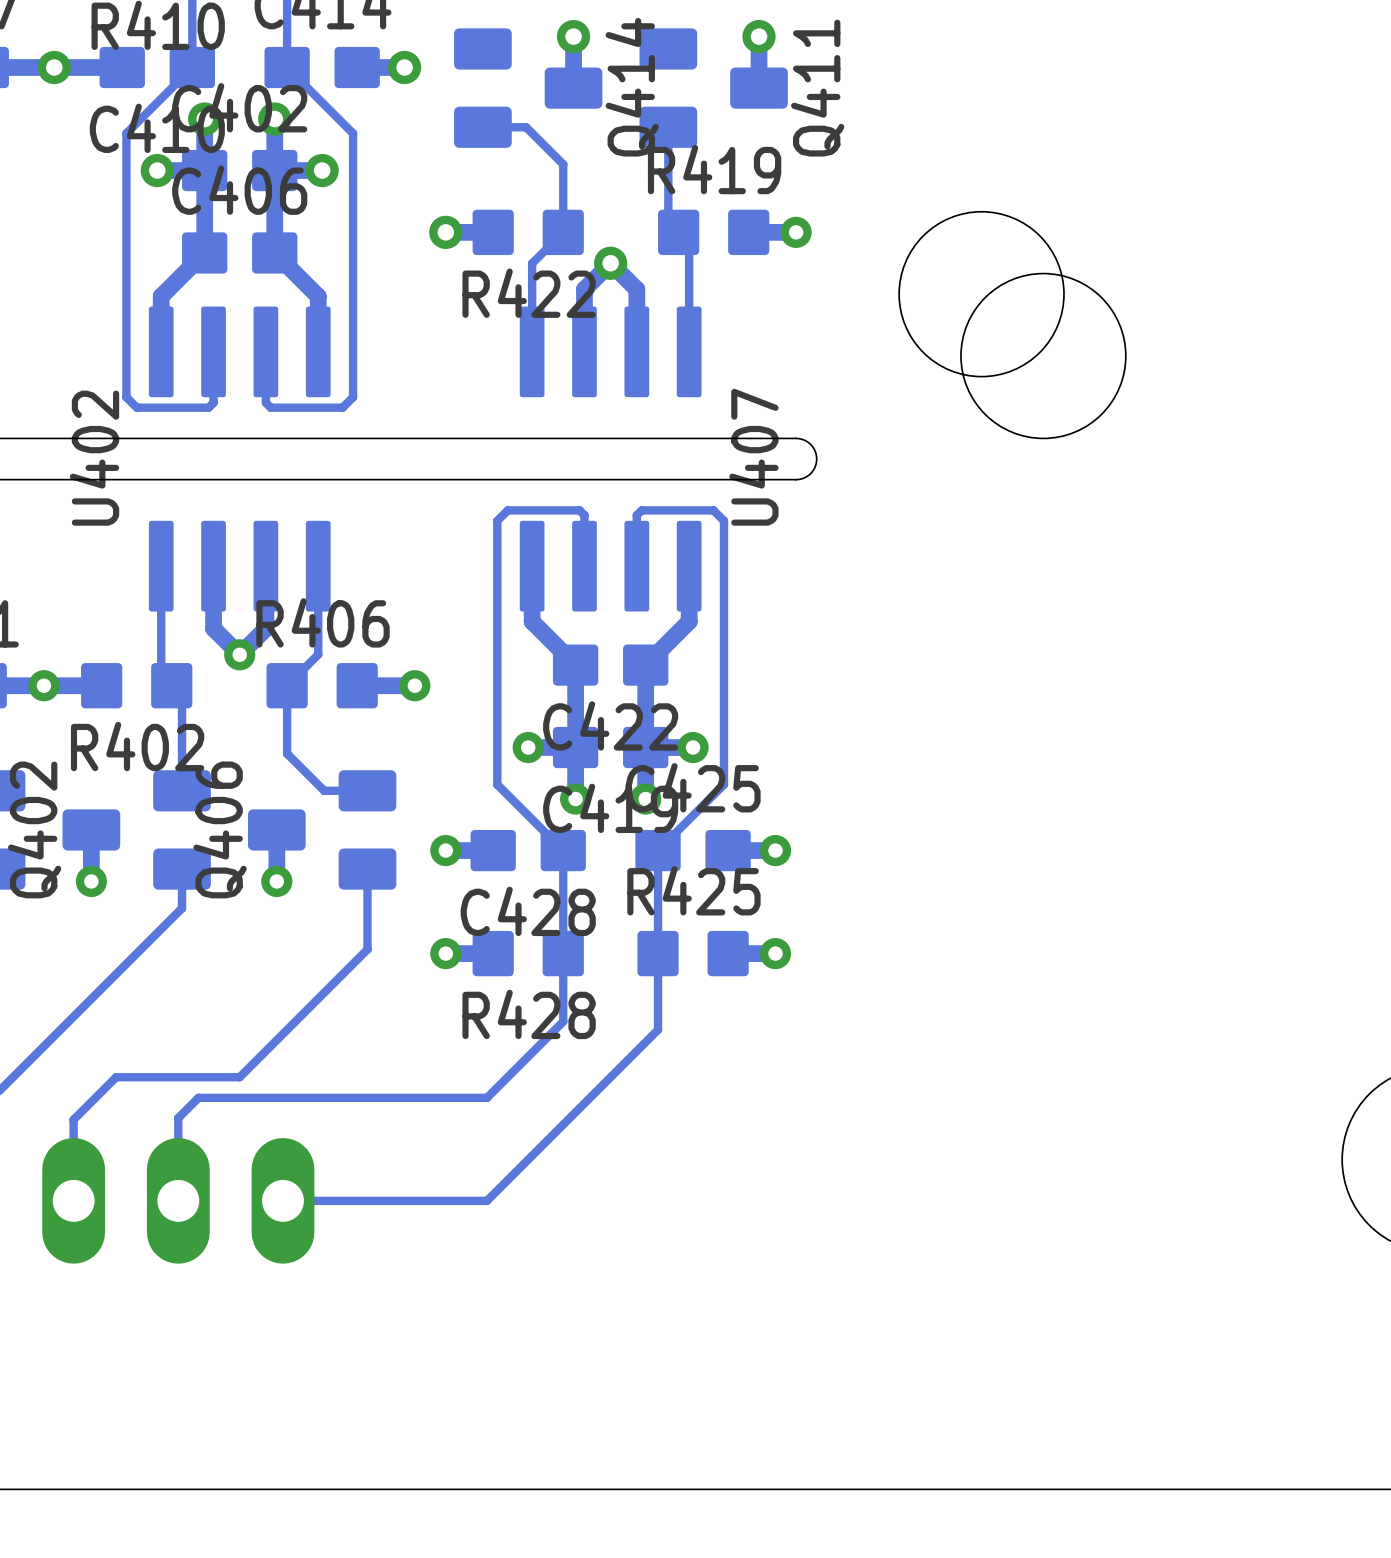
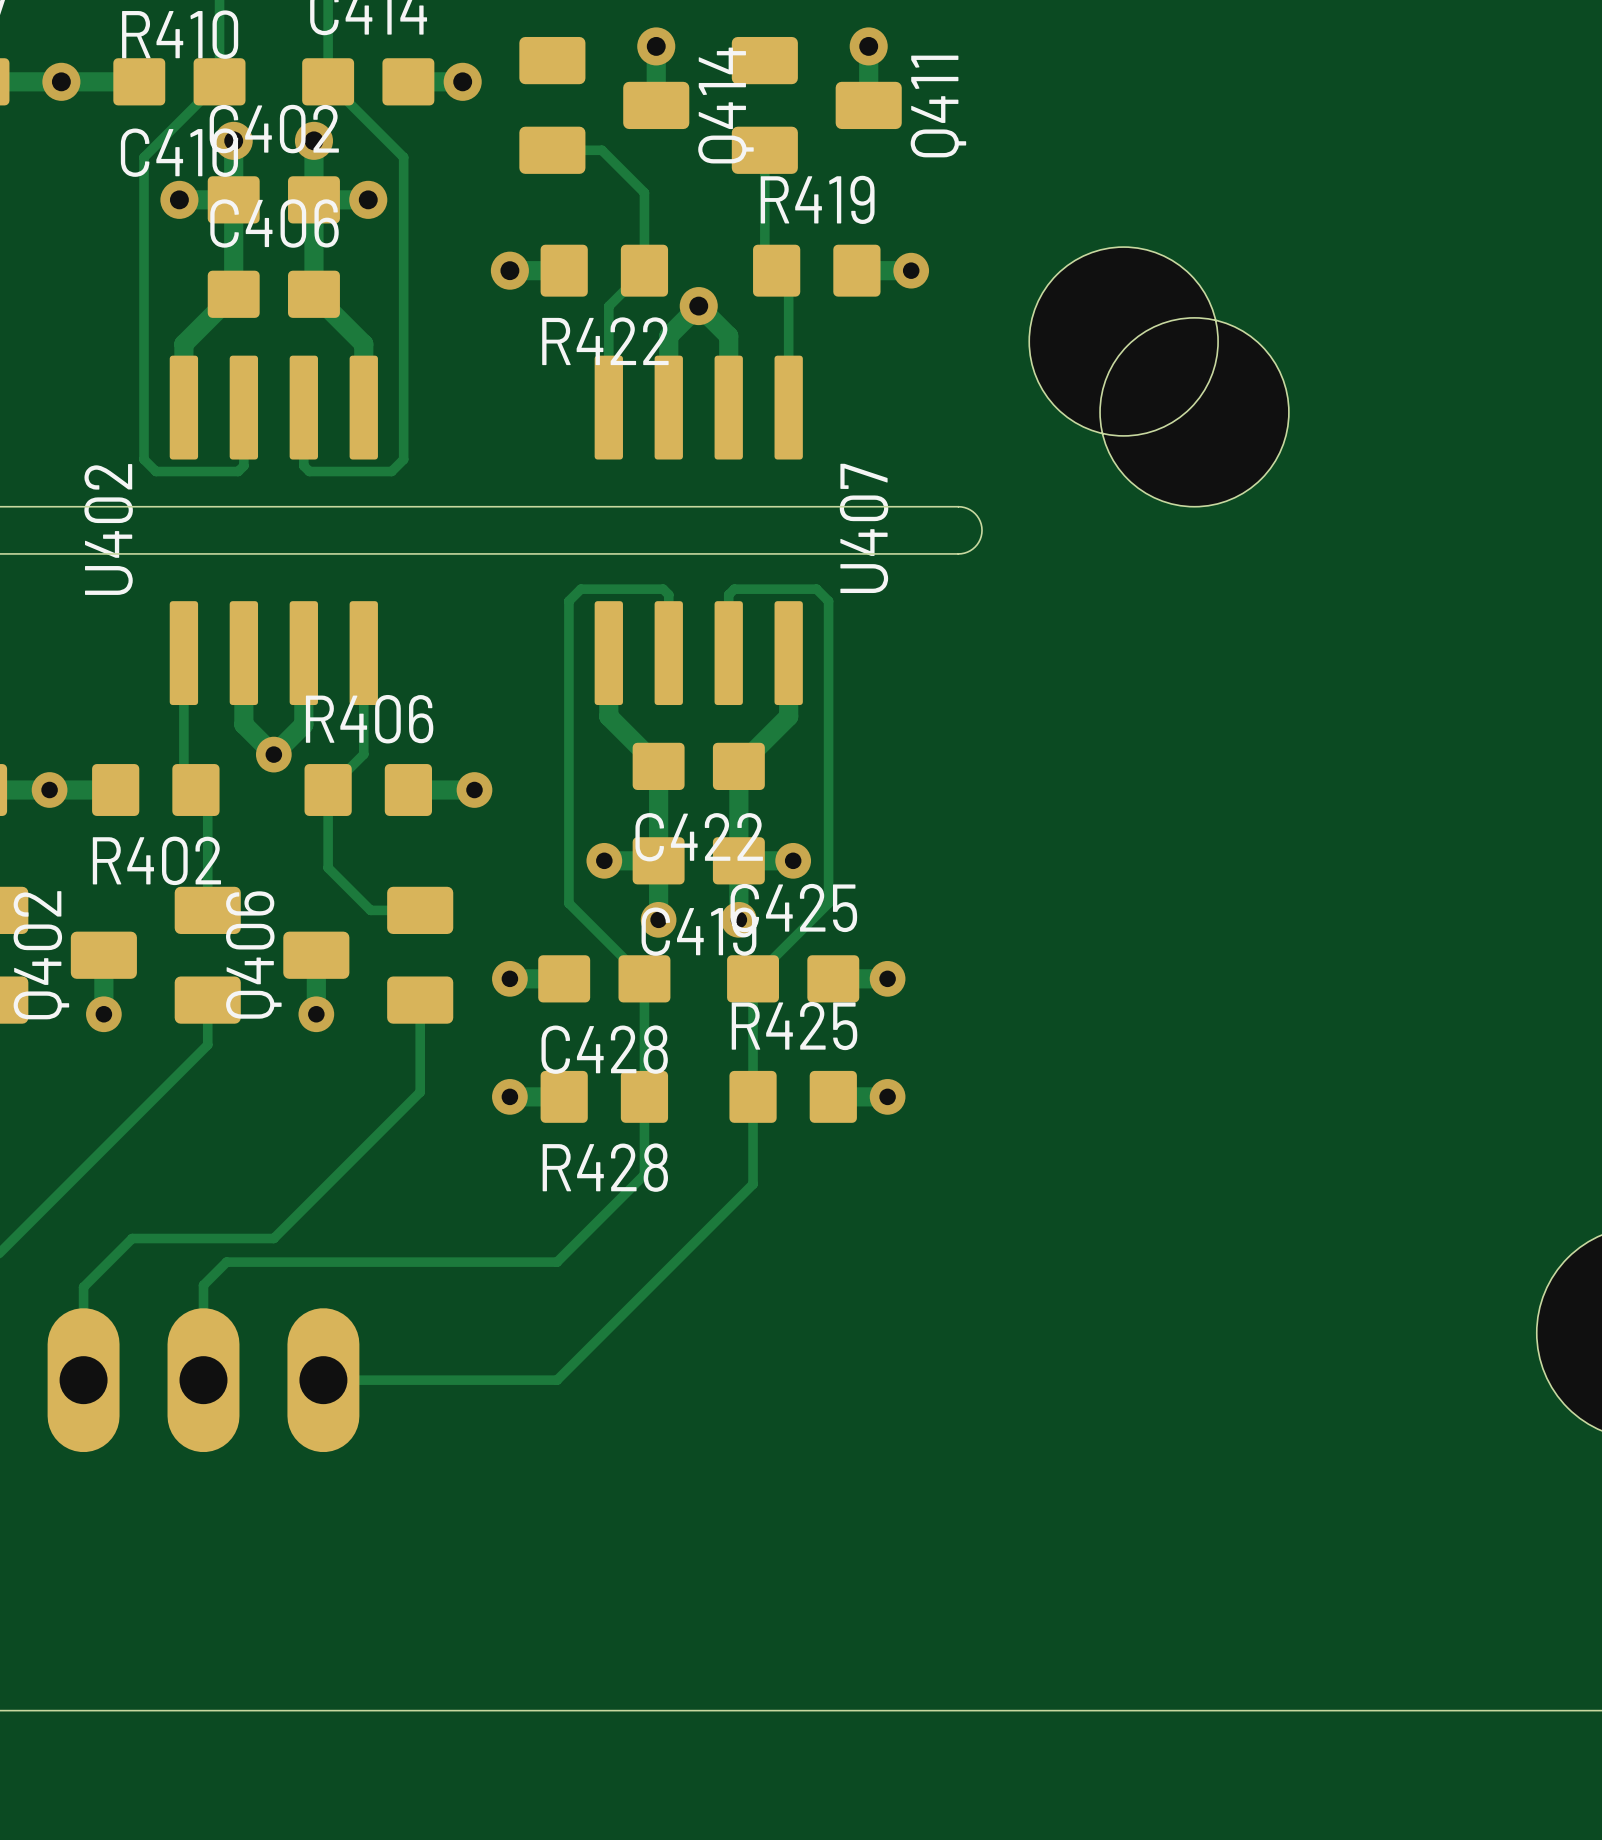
board edge: (796, 438) (803, 440) (810, 444) (815, 451) (816, 459) (815, 466) (810, 473) (803, 478) (796, 479) -> (911, 506) (964, 507) (977, 515) (982, 530) (977, 544) (964, 553) (911, 553)

